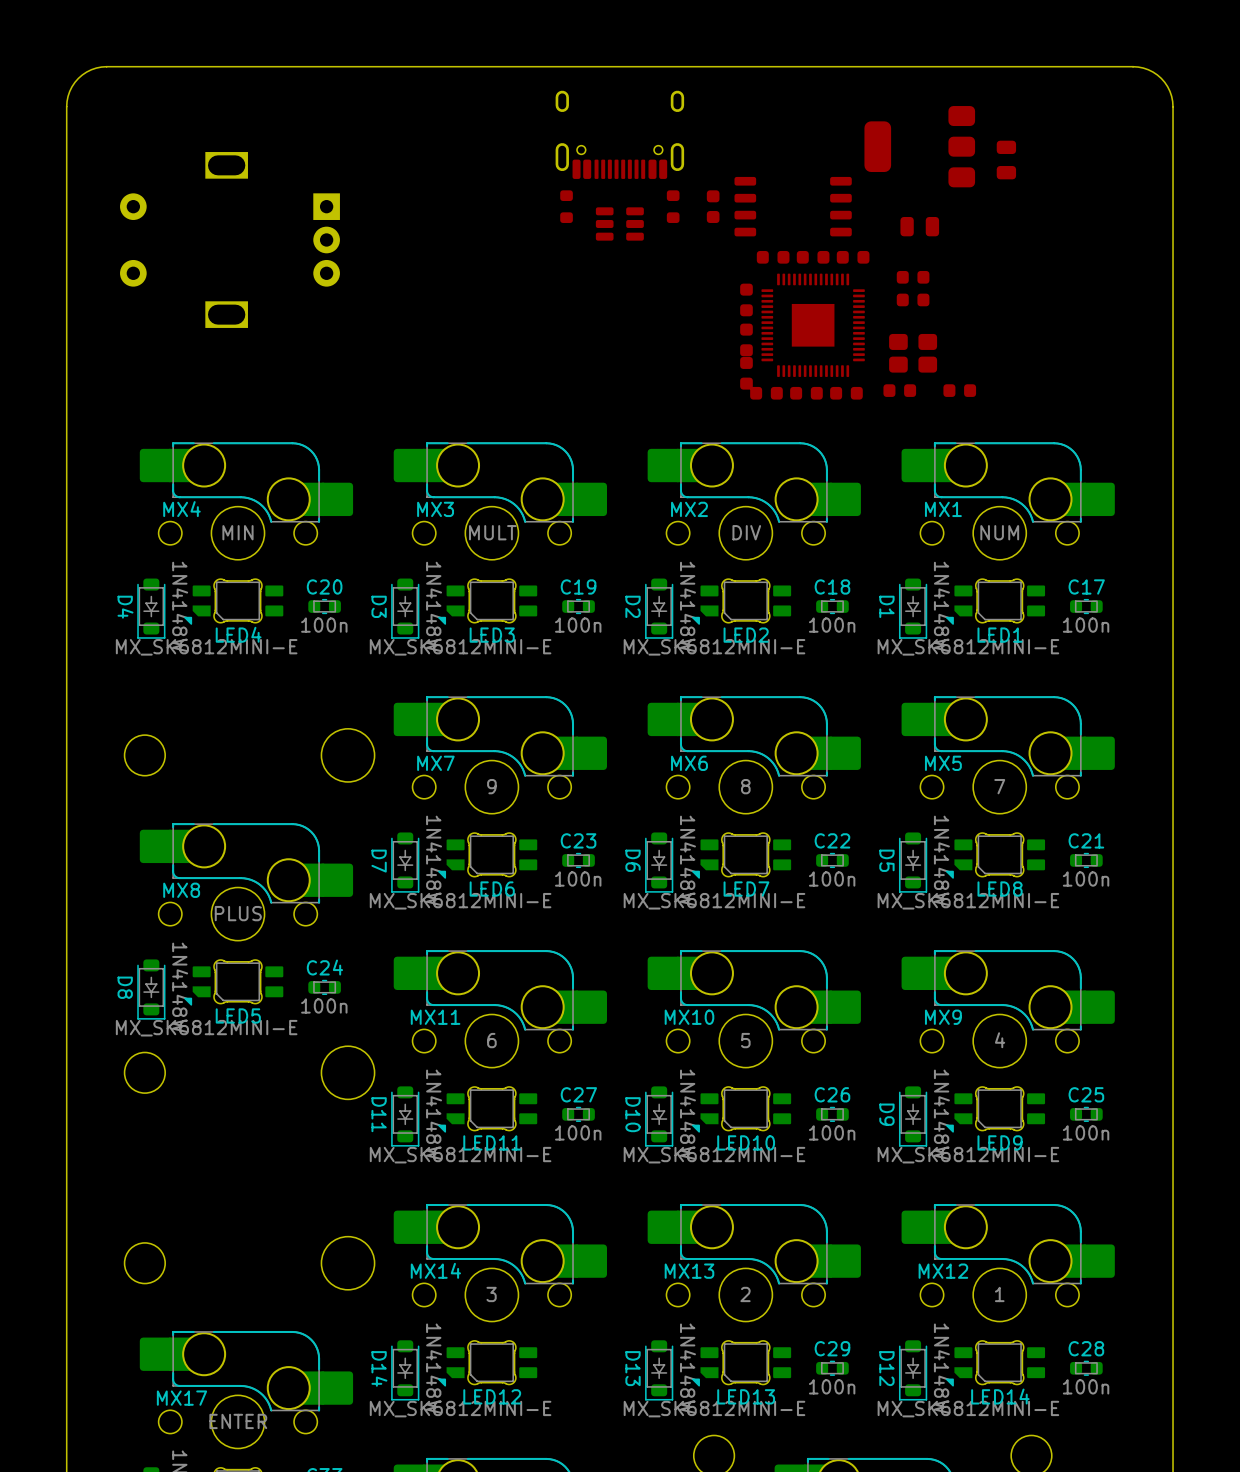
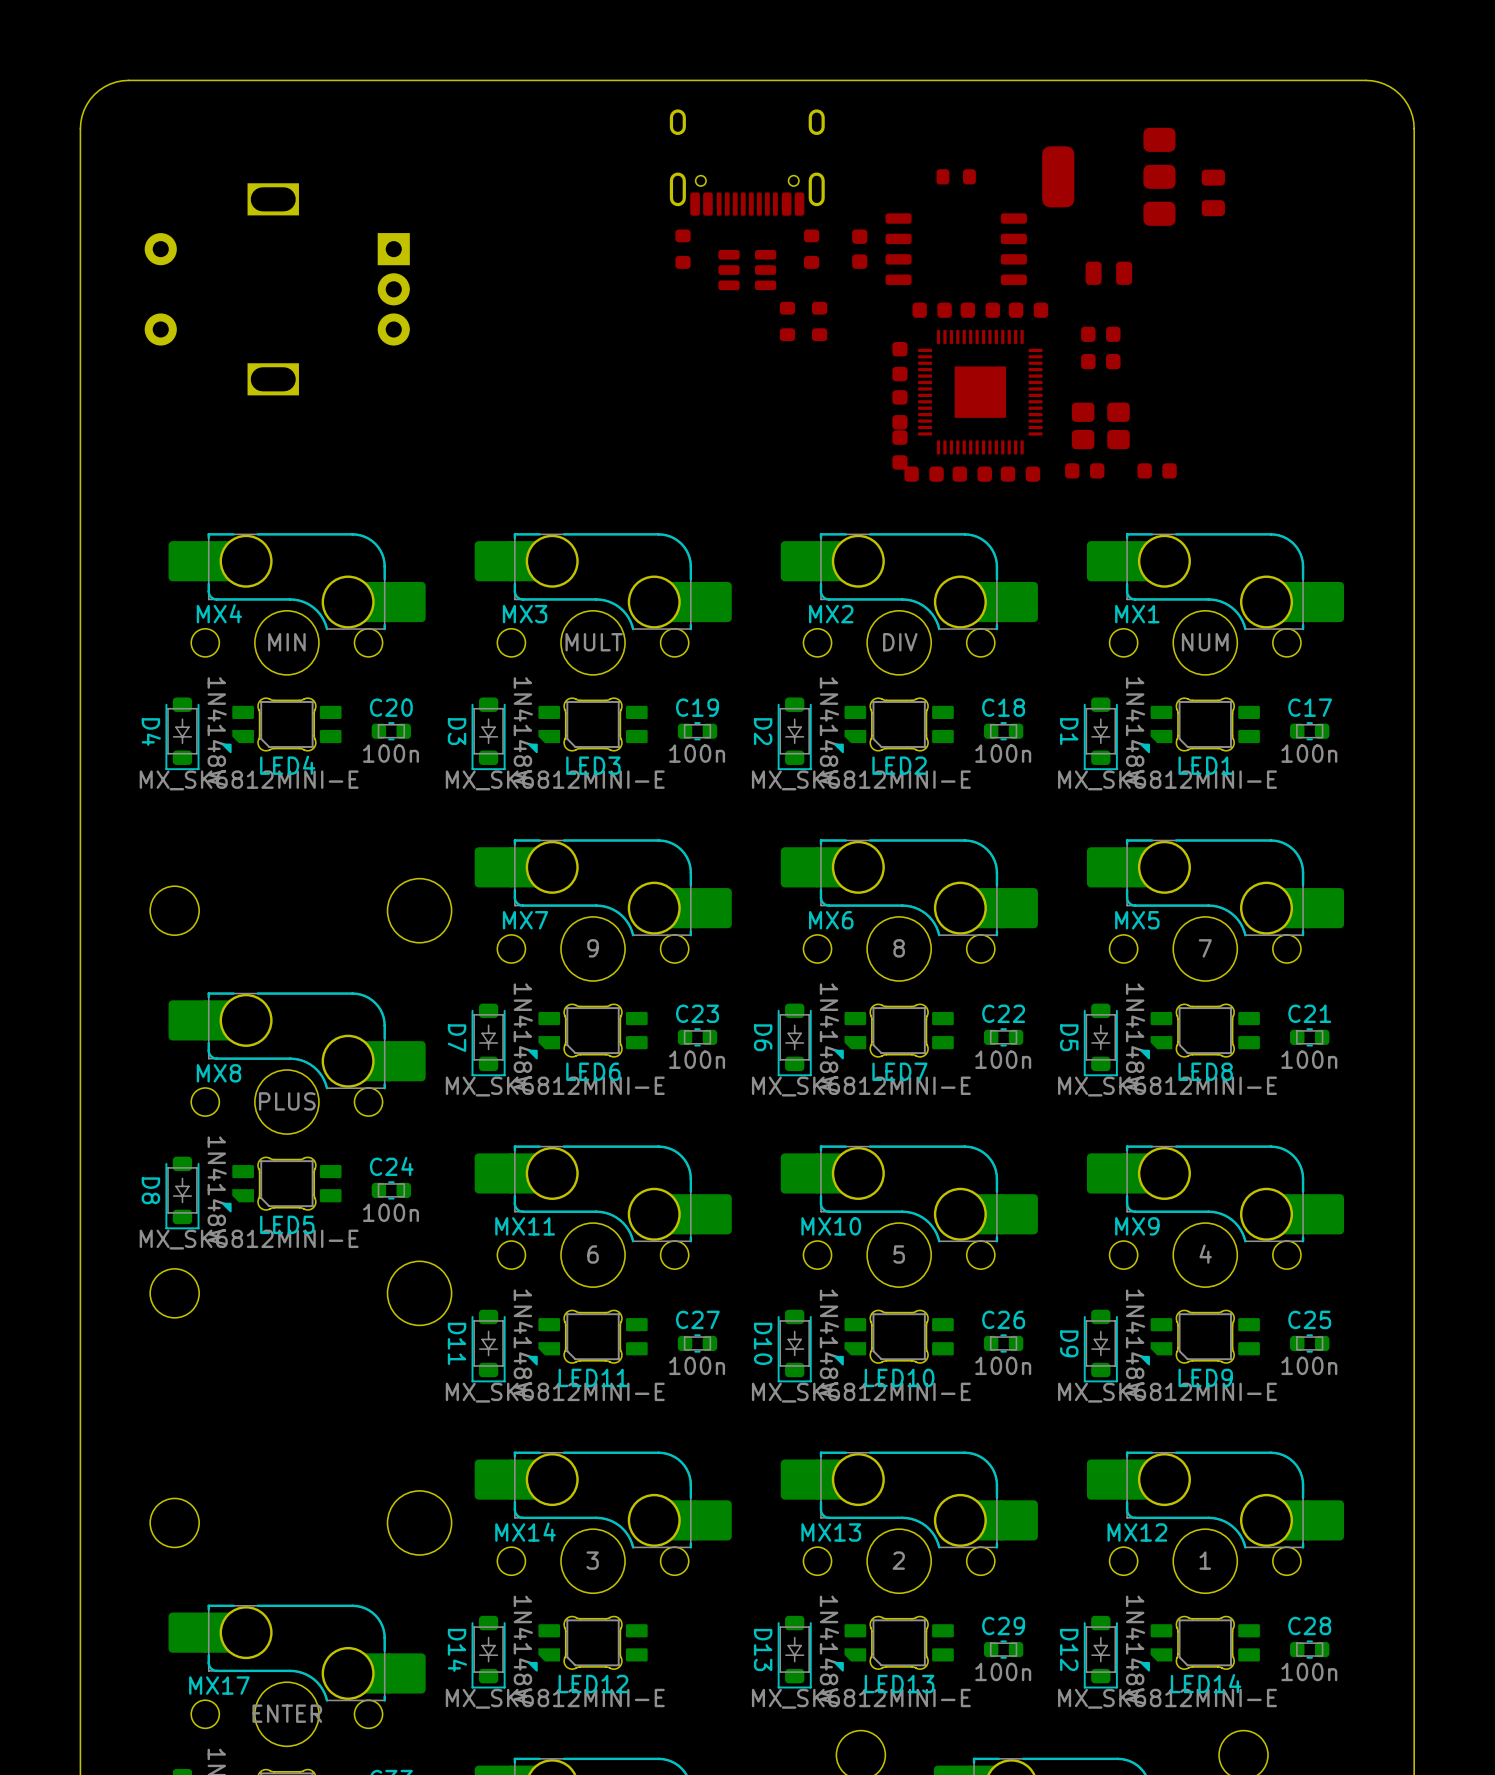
part: none -> (956, 176)
part: none -> (787, 321)
part: none -> (819, 321)

